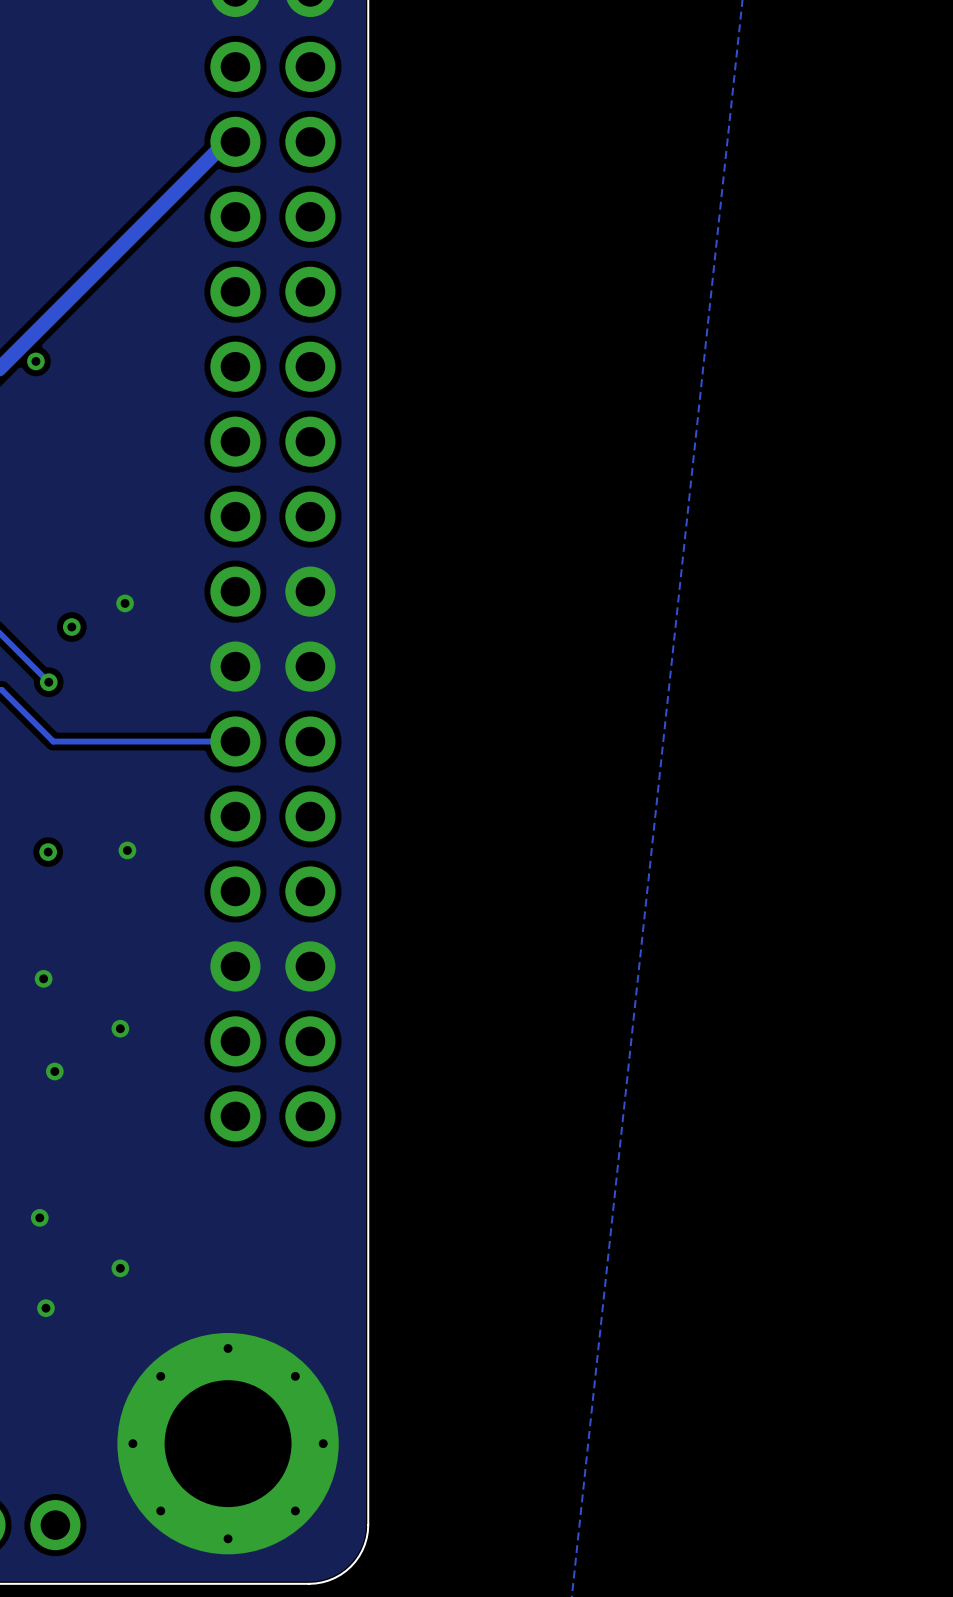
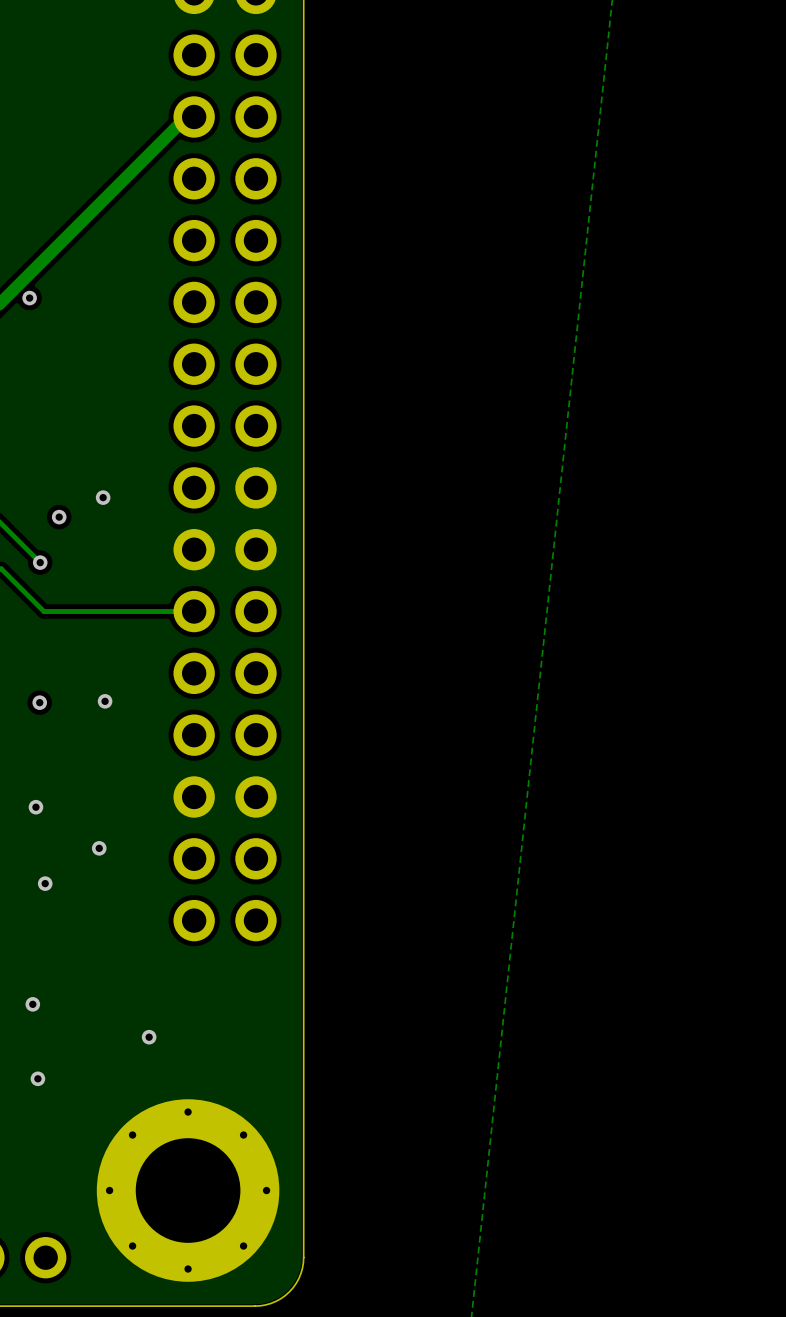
via position: (120, 1268) -> (149, 1037)

